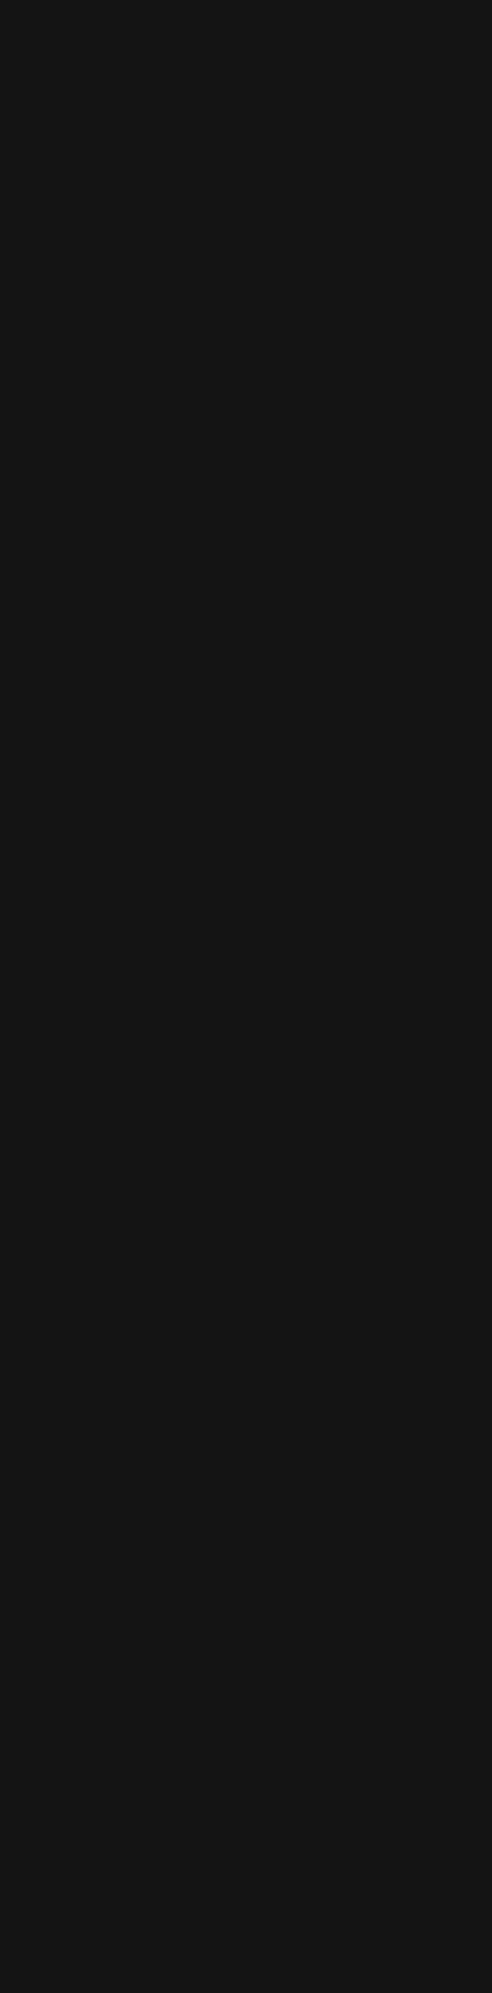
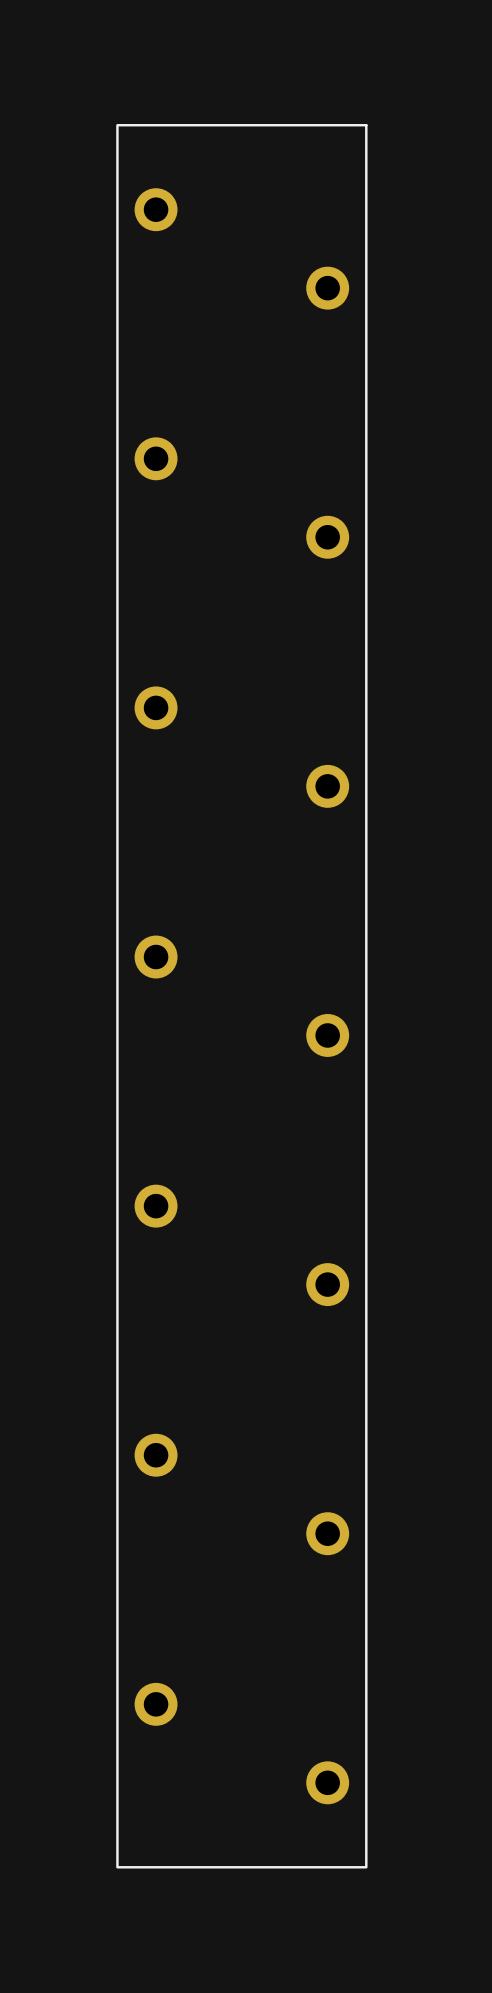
part: none -> (241, 996)

